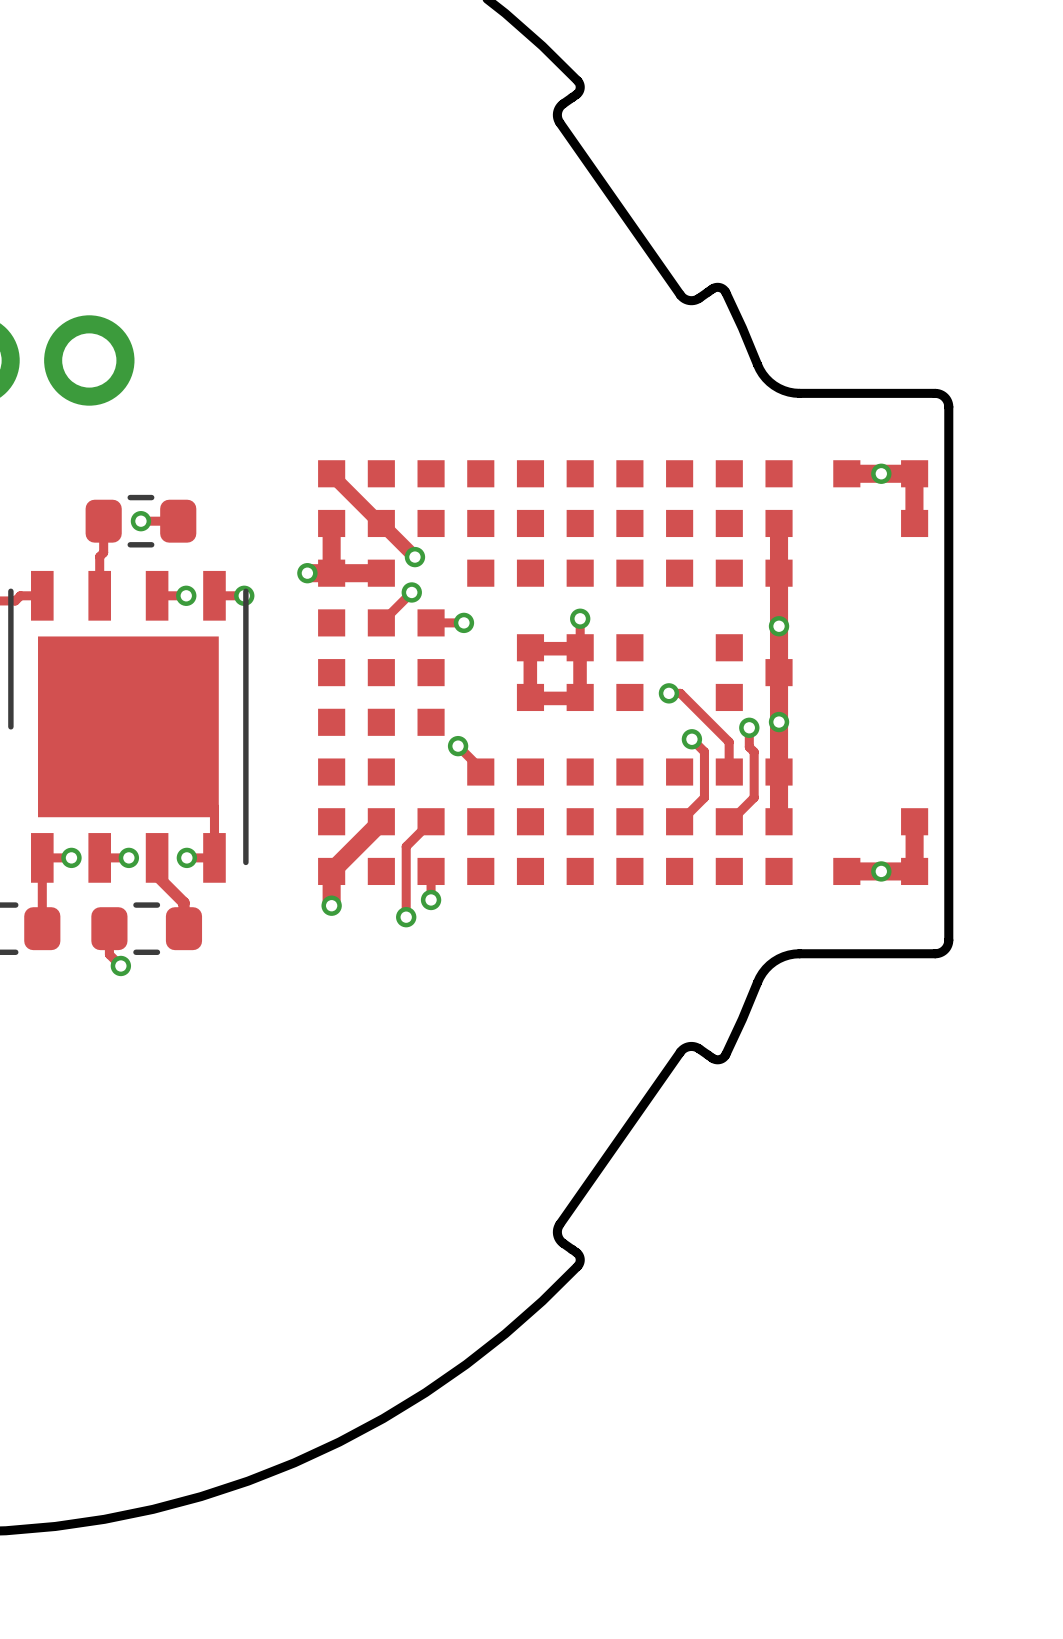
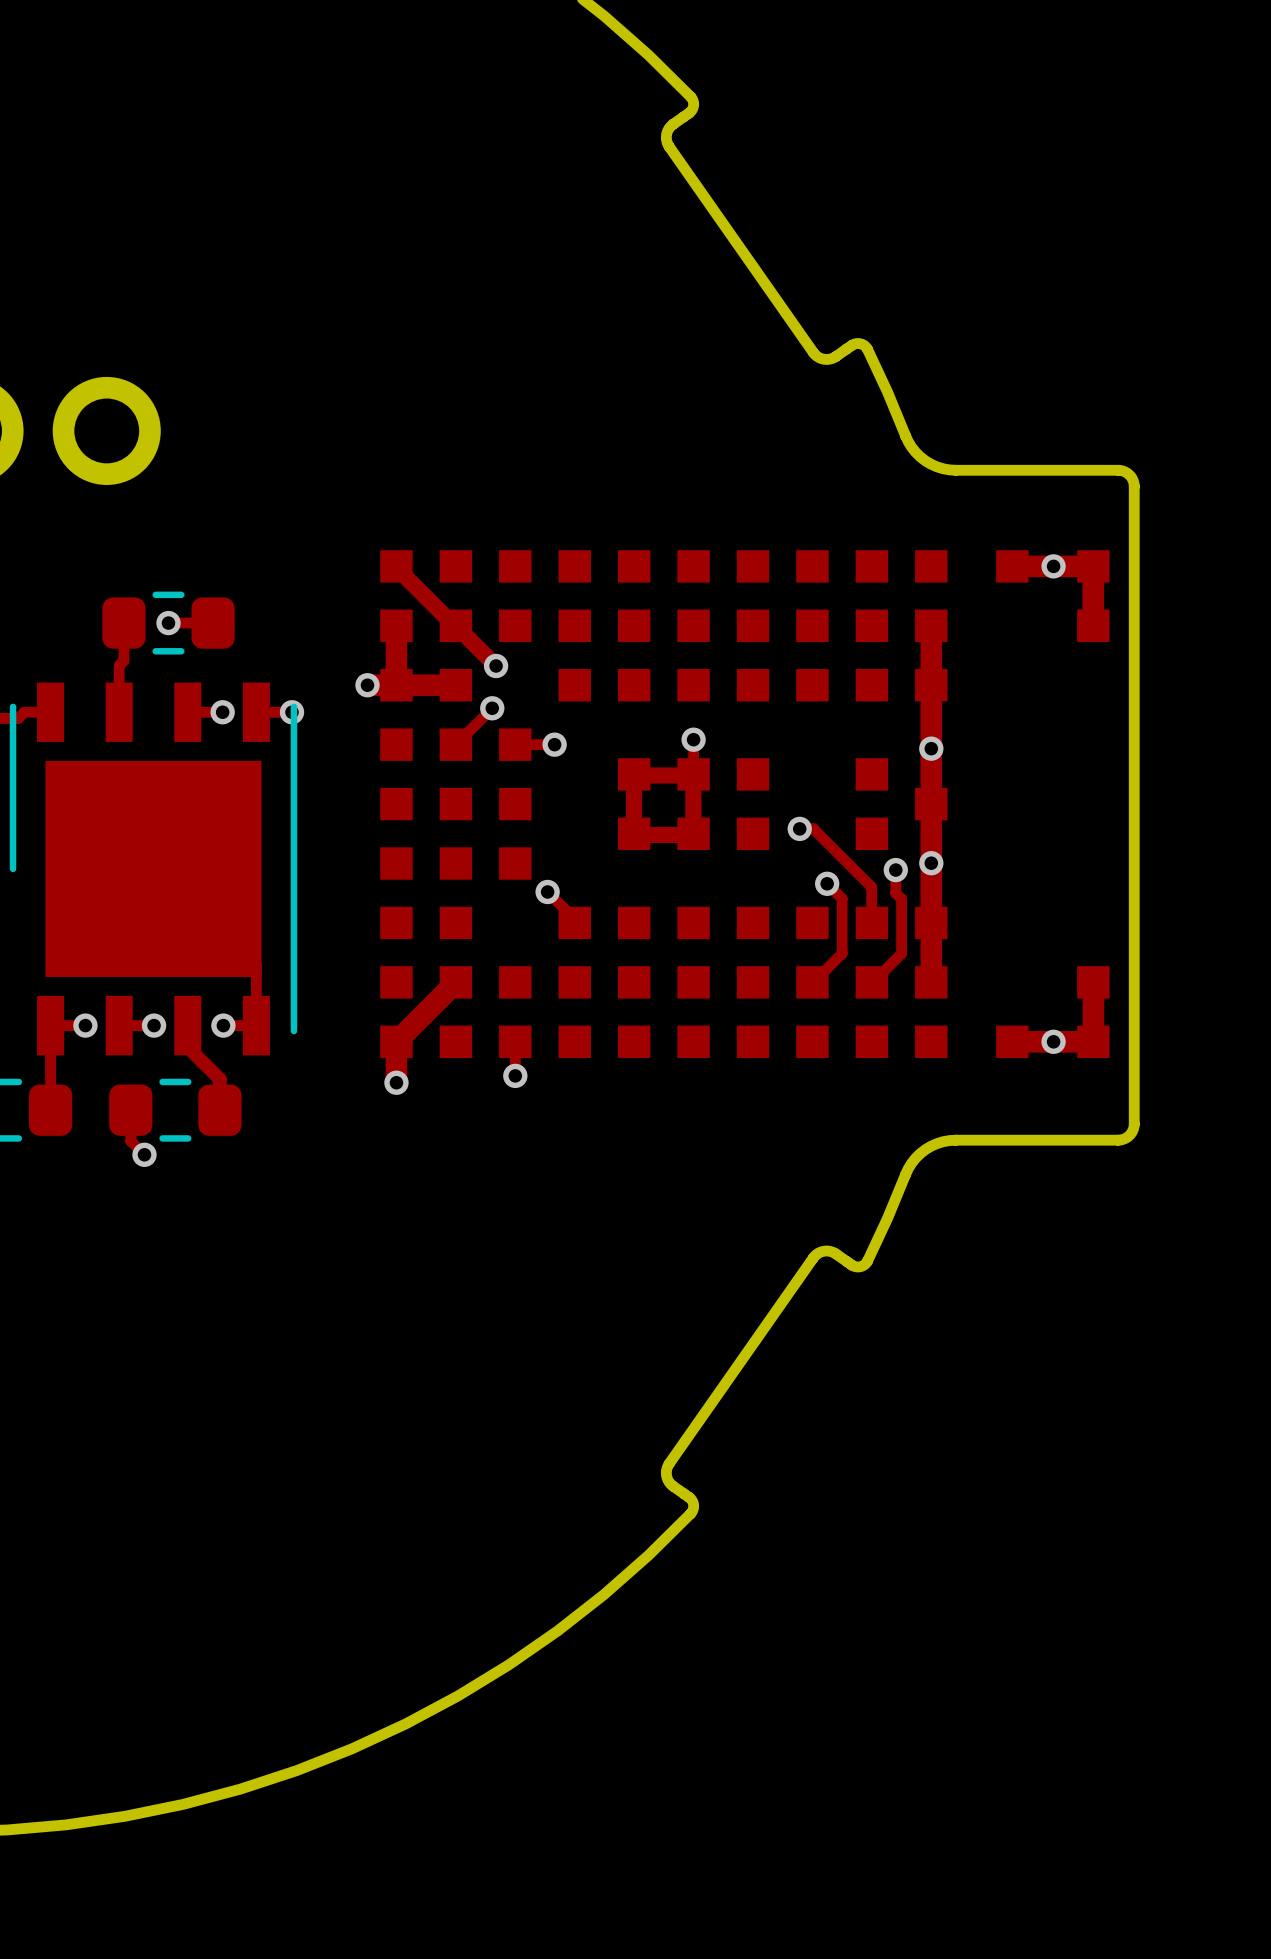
track: (431, 821) (406, 846) (406, 917) -> none
via: (406, 917) -> none

